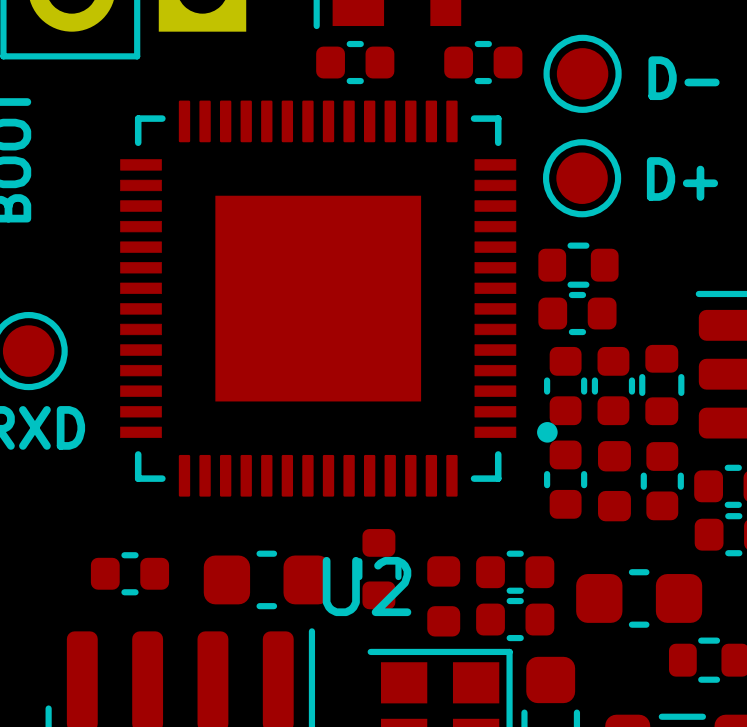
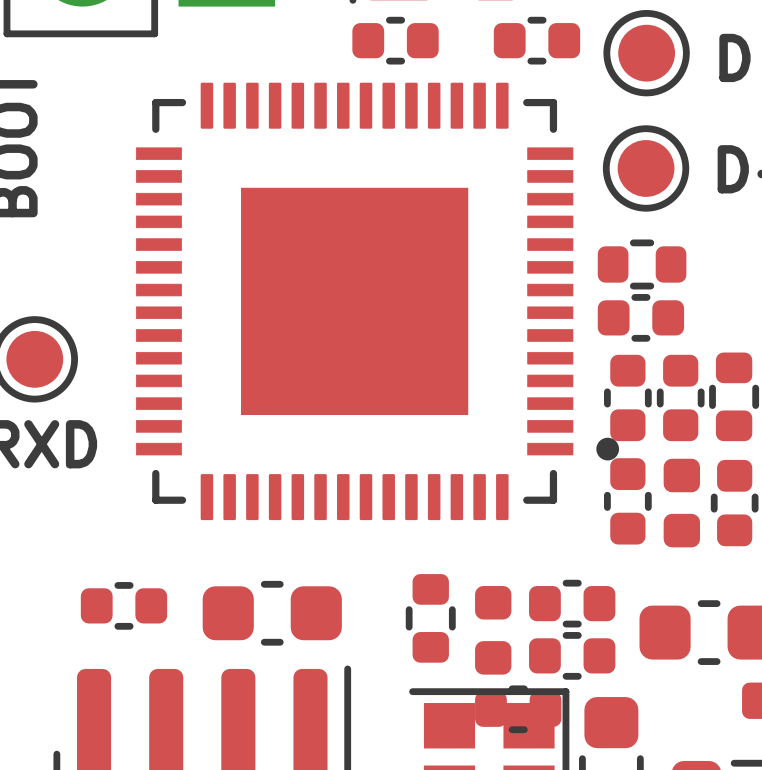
part position: (378, 569) -> (430, 618)
part position: (129, 573) -> (123, 605)
part position: (266, 579) -> (272, 613)
U2 name: U2 (367, 586) -> none
part: none -> (518, 709)

